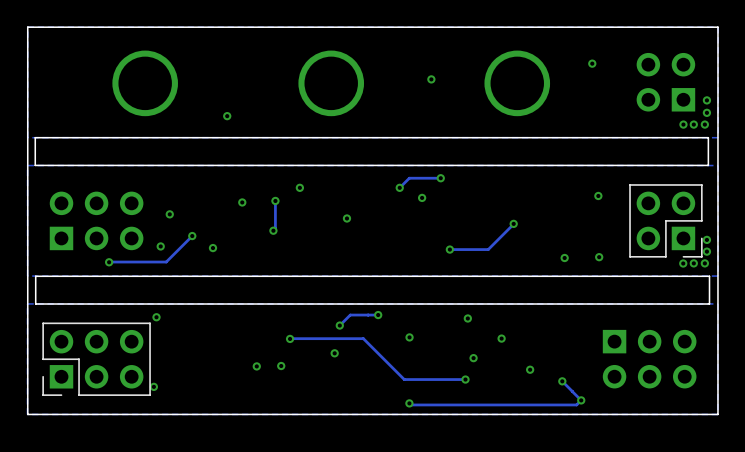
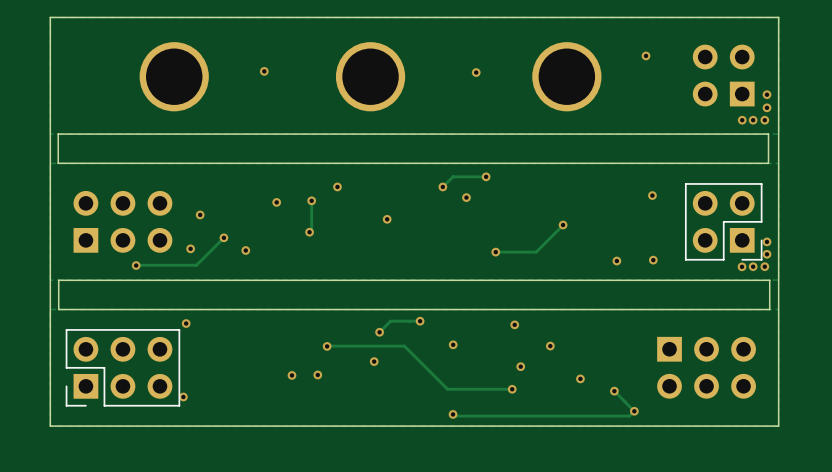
via position: (227, 116) -> (264, 71)

